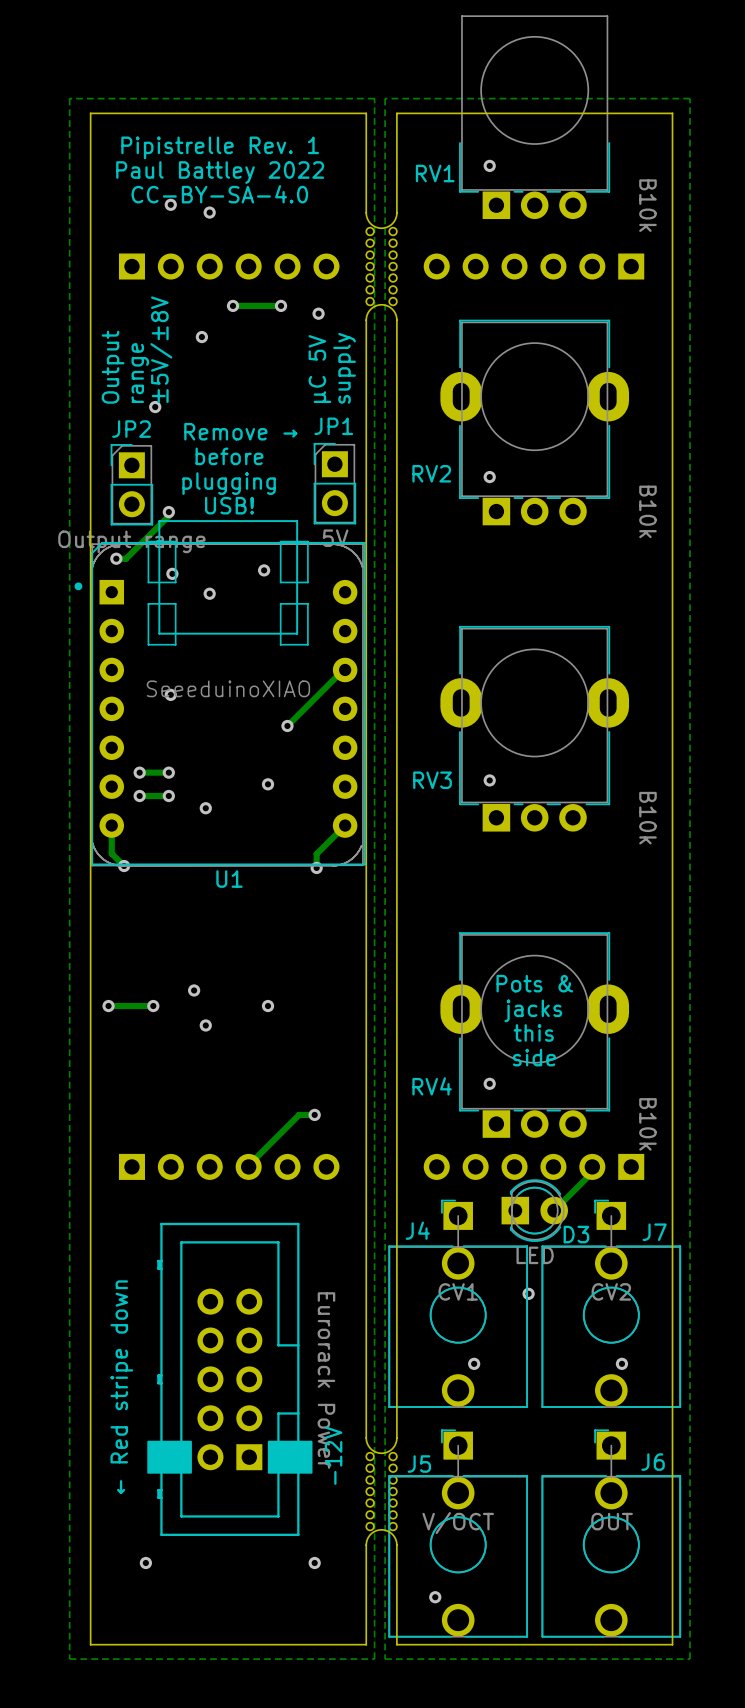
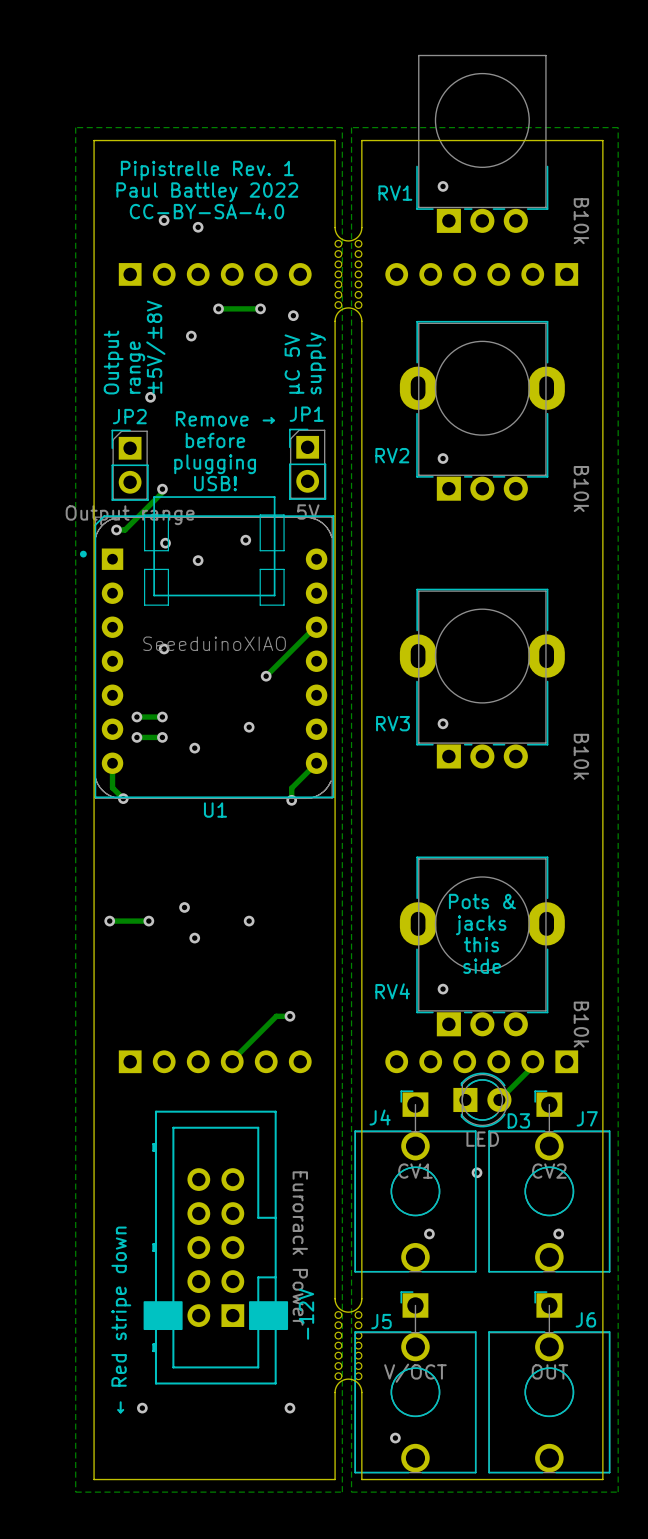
text position: ← Red stripe down (121, 1387) -> ← Red stripe down (121, 1320)

